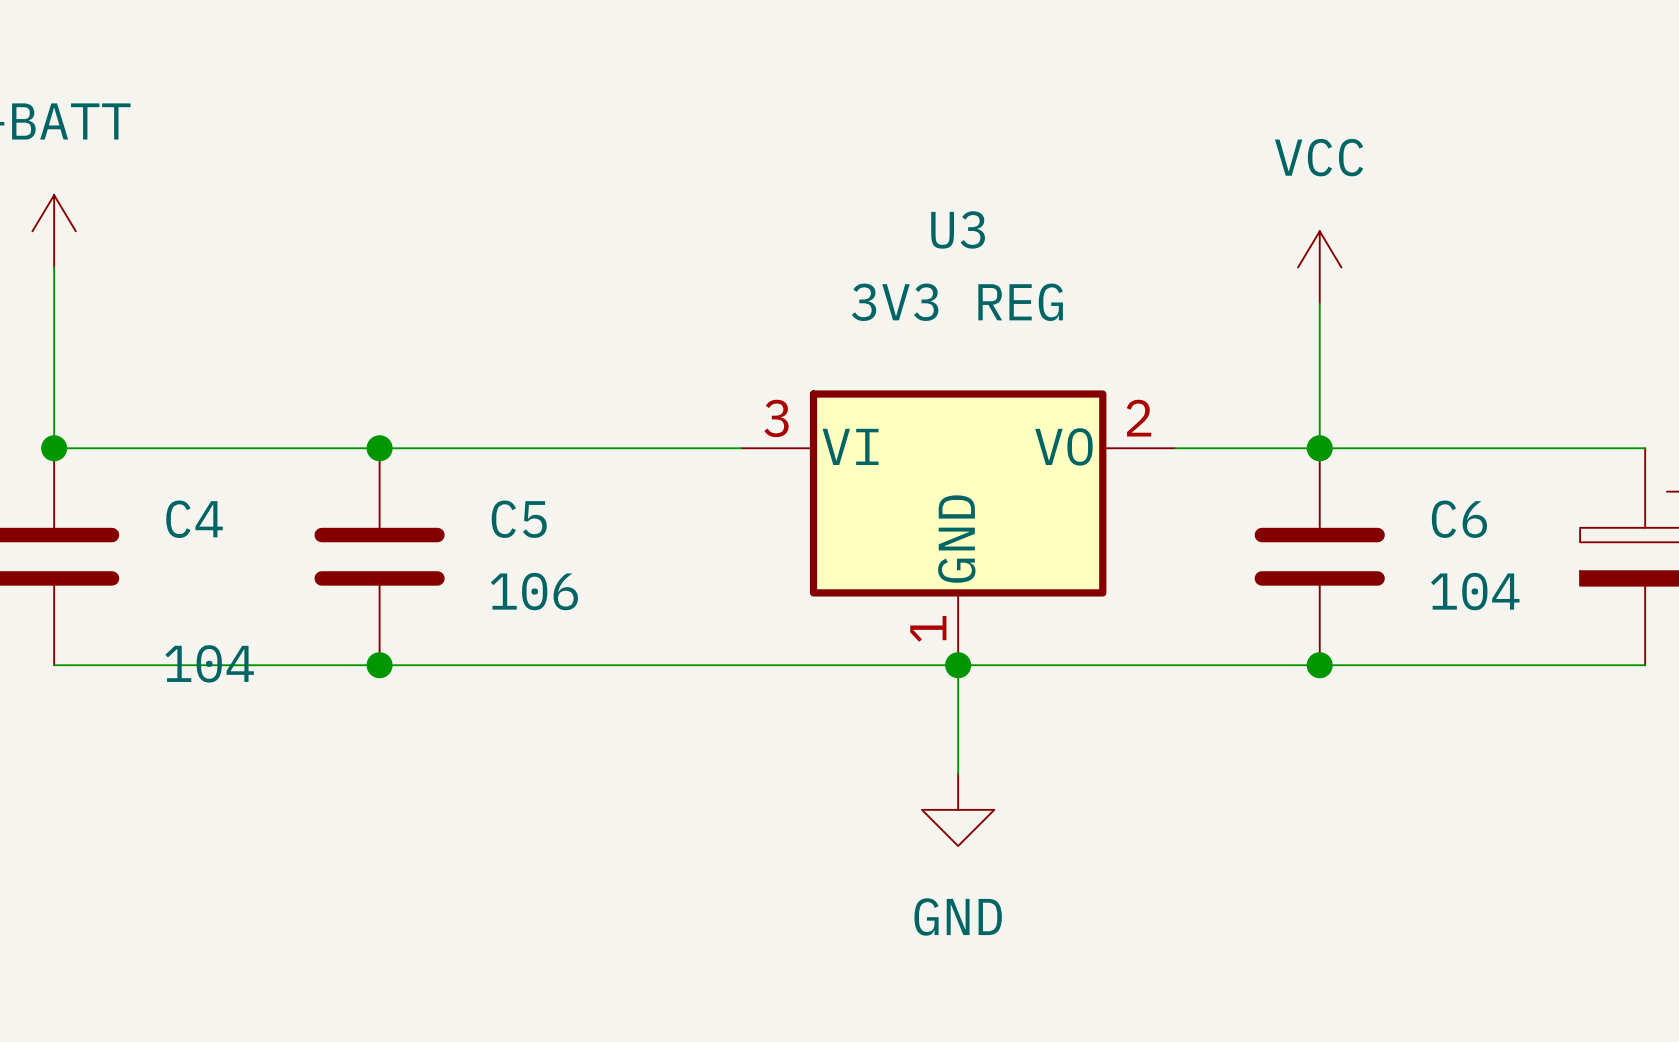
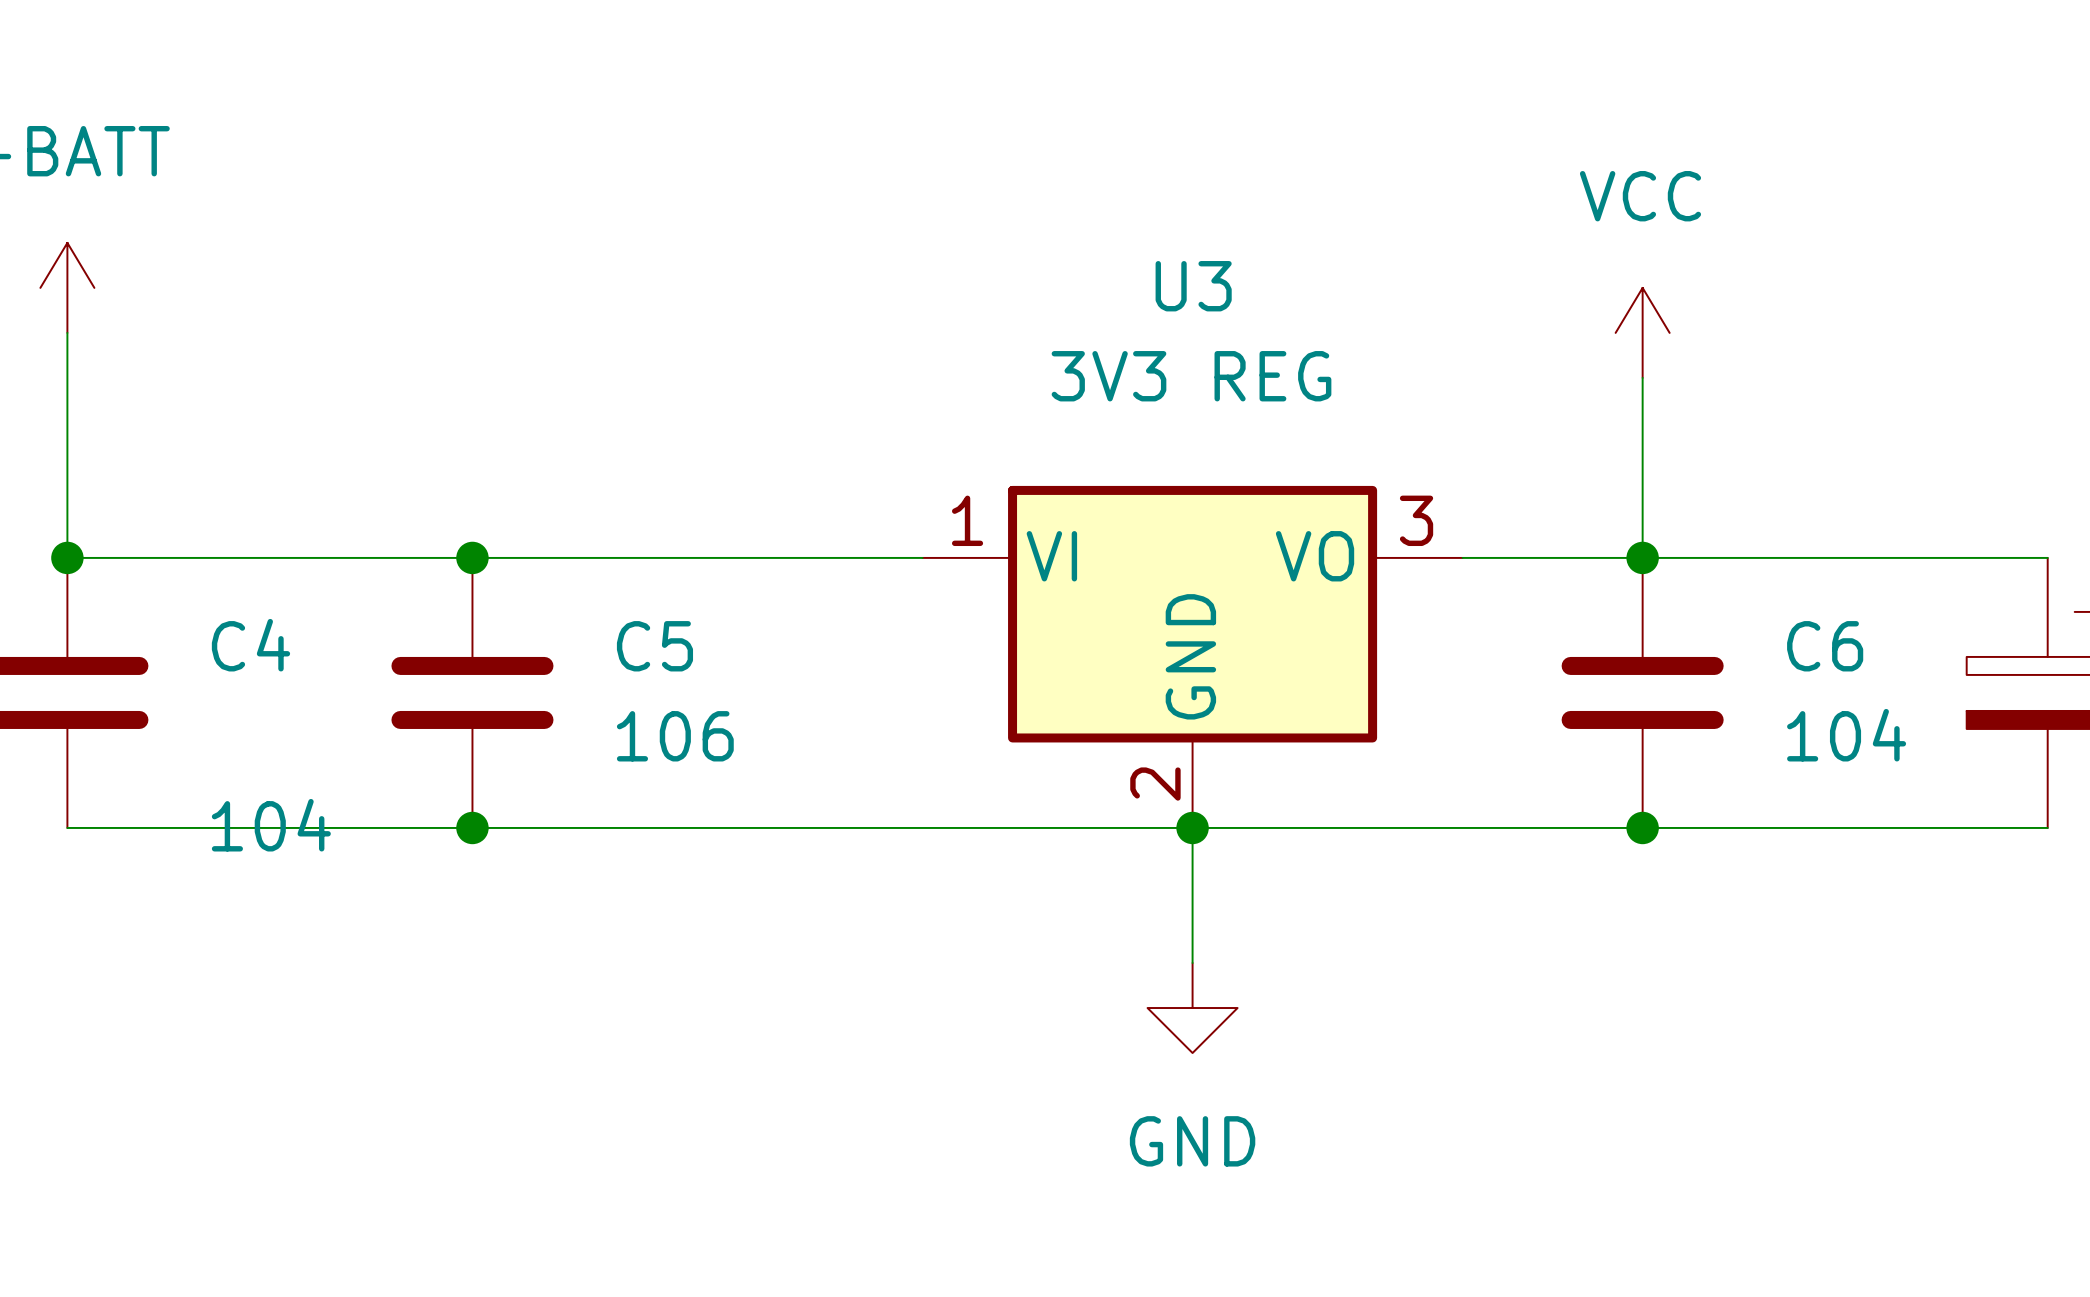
U3 pin number: 3 (776, 418) -> 1 (967, 520)
U3 pin number: 2 (1138, 418) -> 3 (1416, 520)
U3 pin number: 1 (928, 628) -> 2 (1155, 784)

